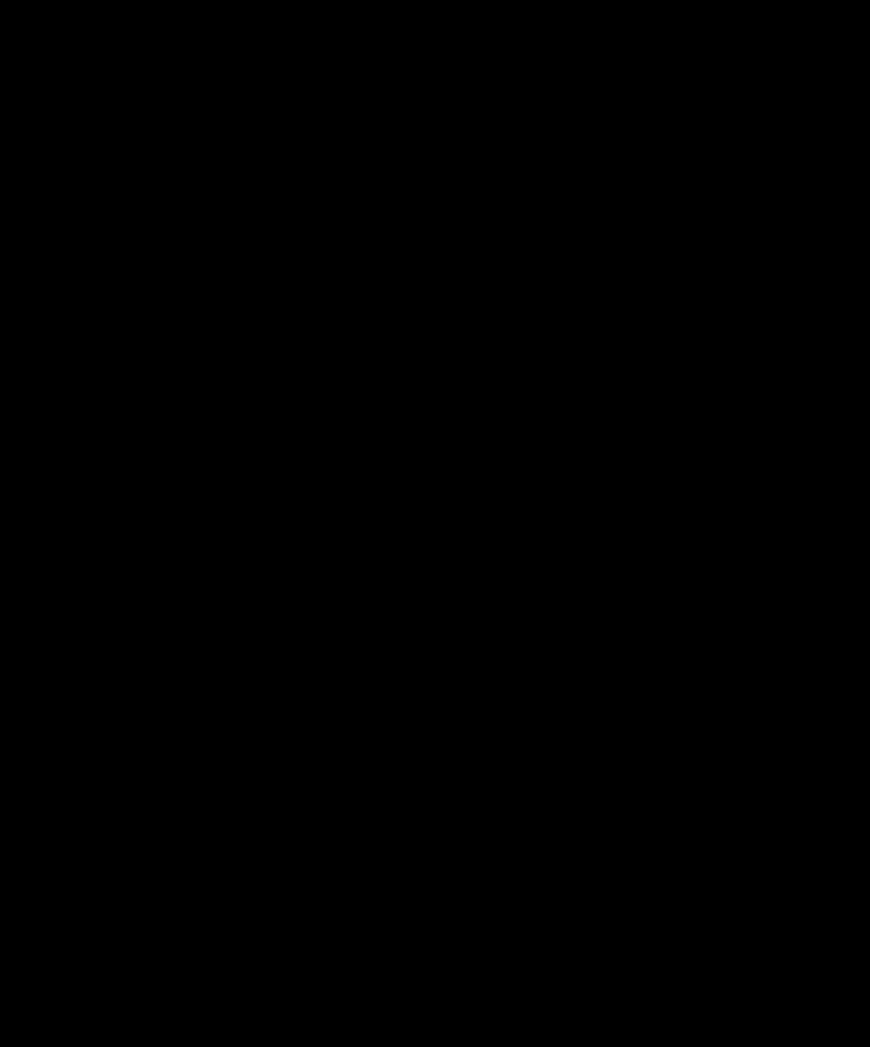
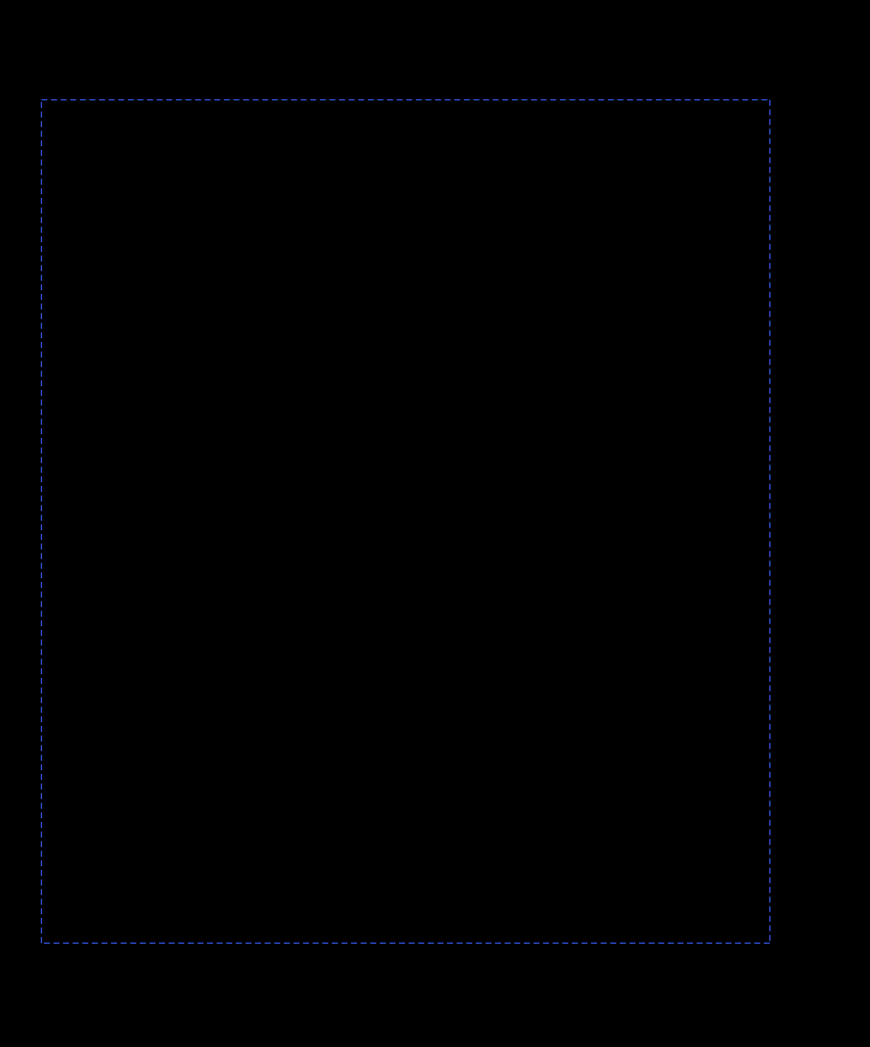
zone outline: none -> (769, 99) (41, 99) (41, 943) (769, 943) (769, 99)

